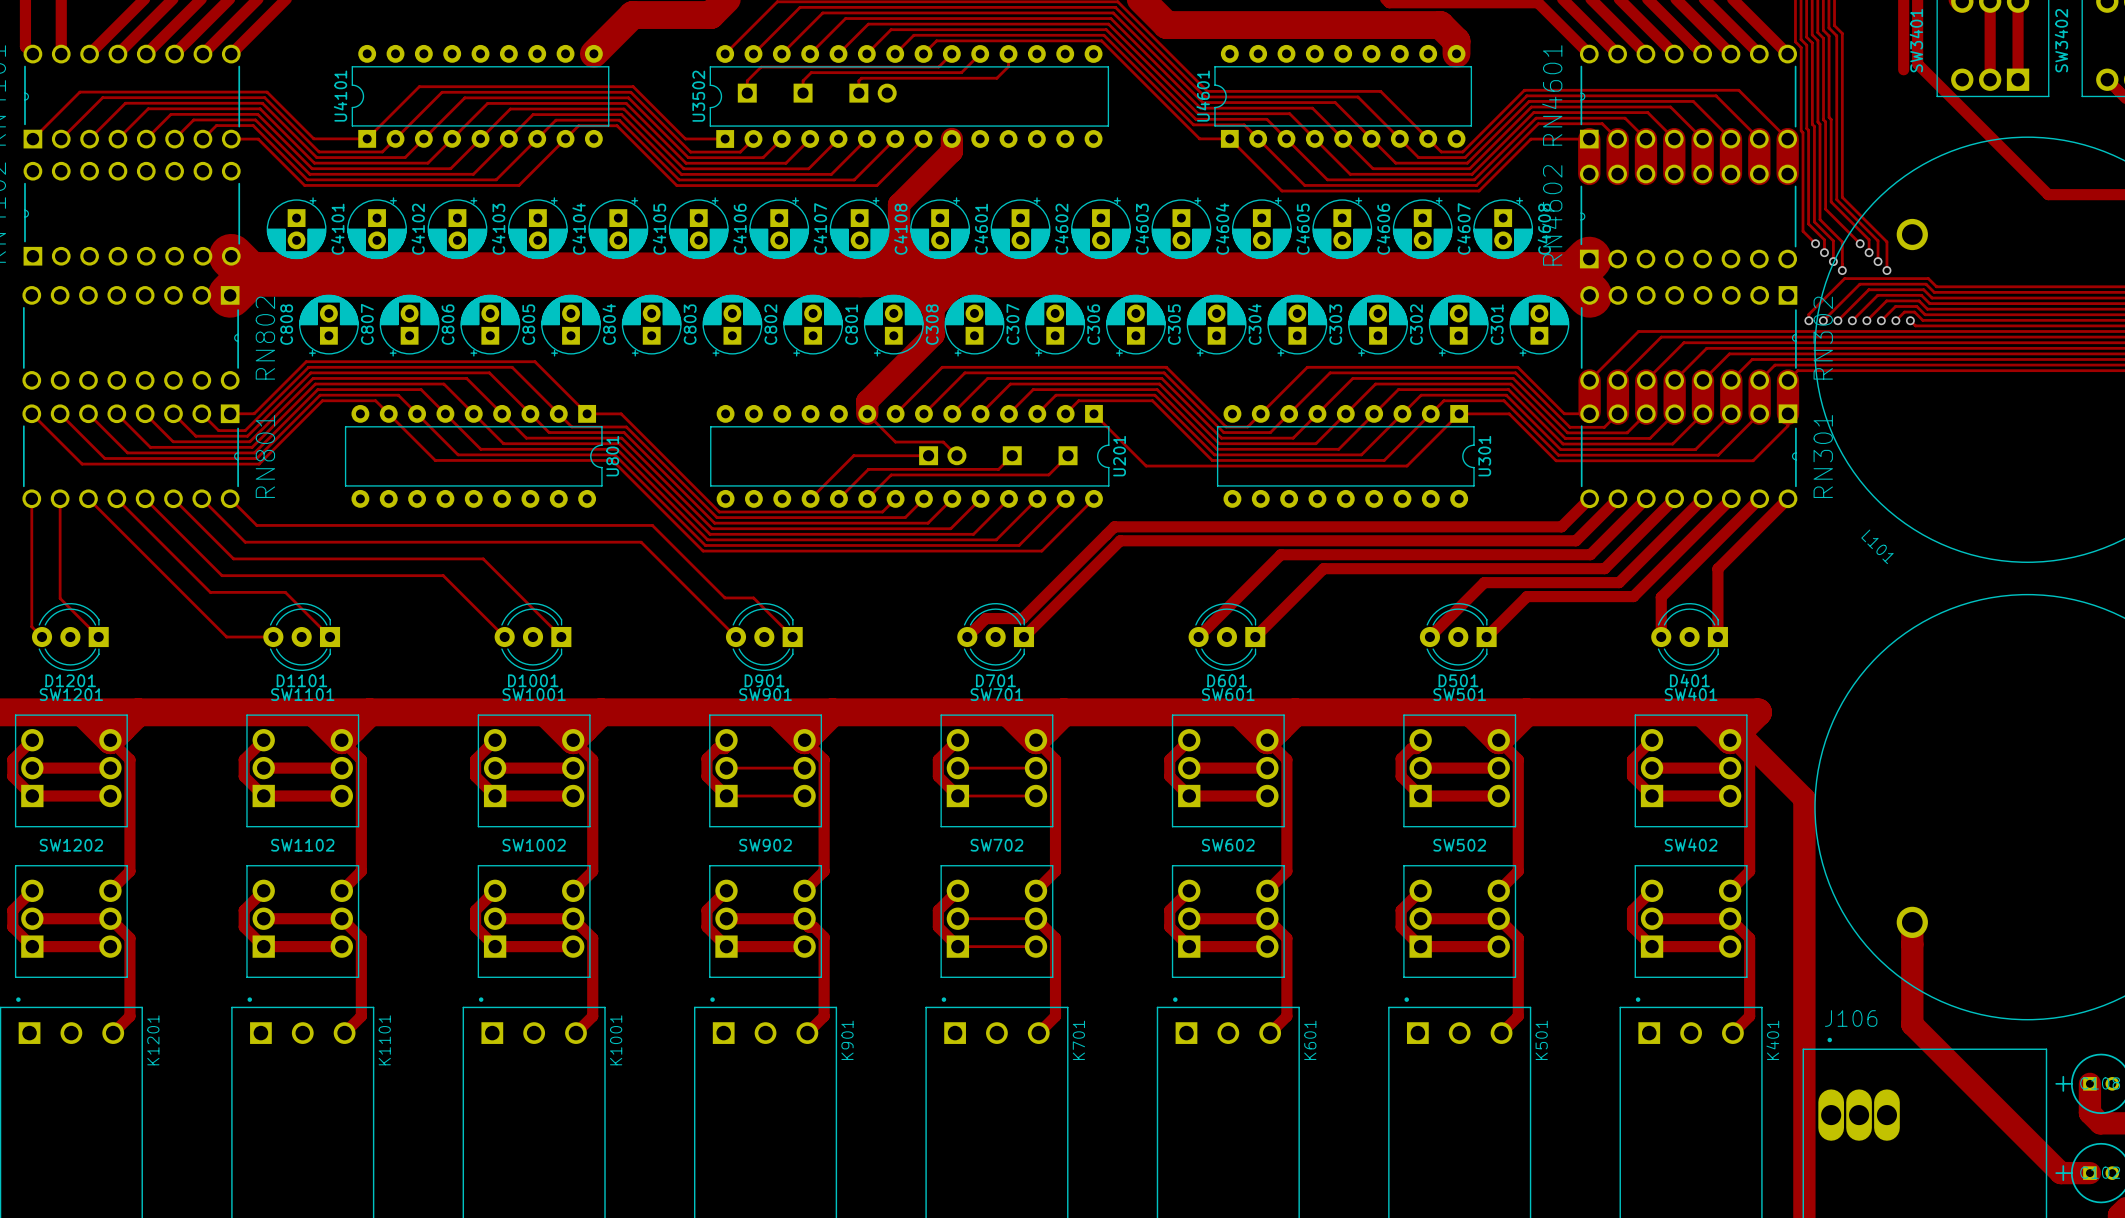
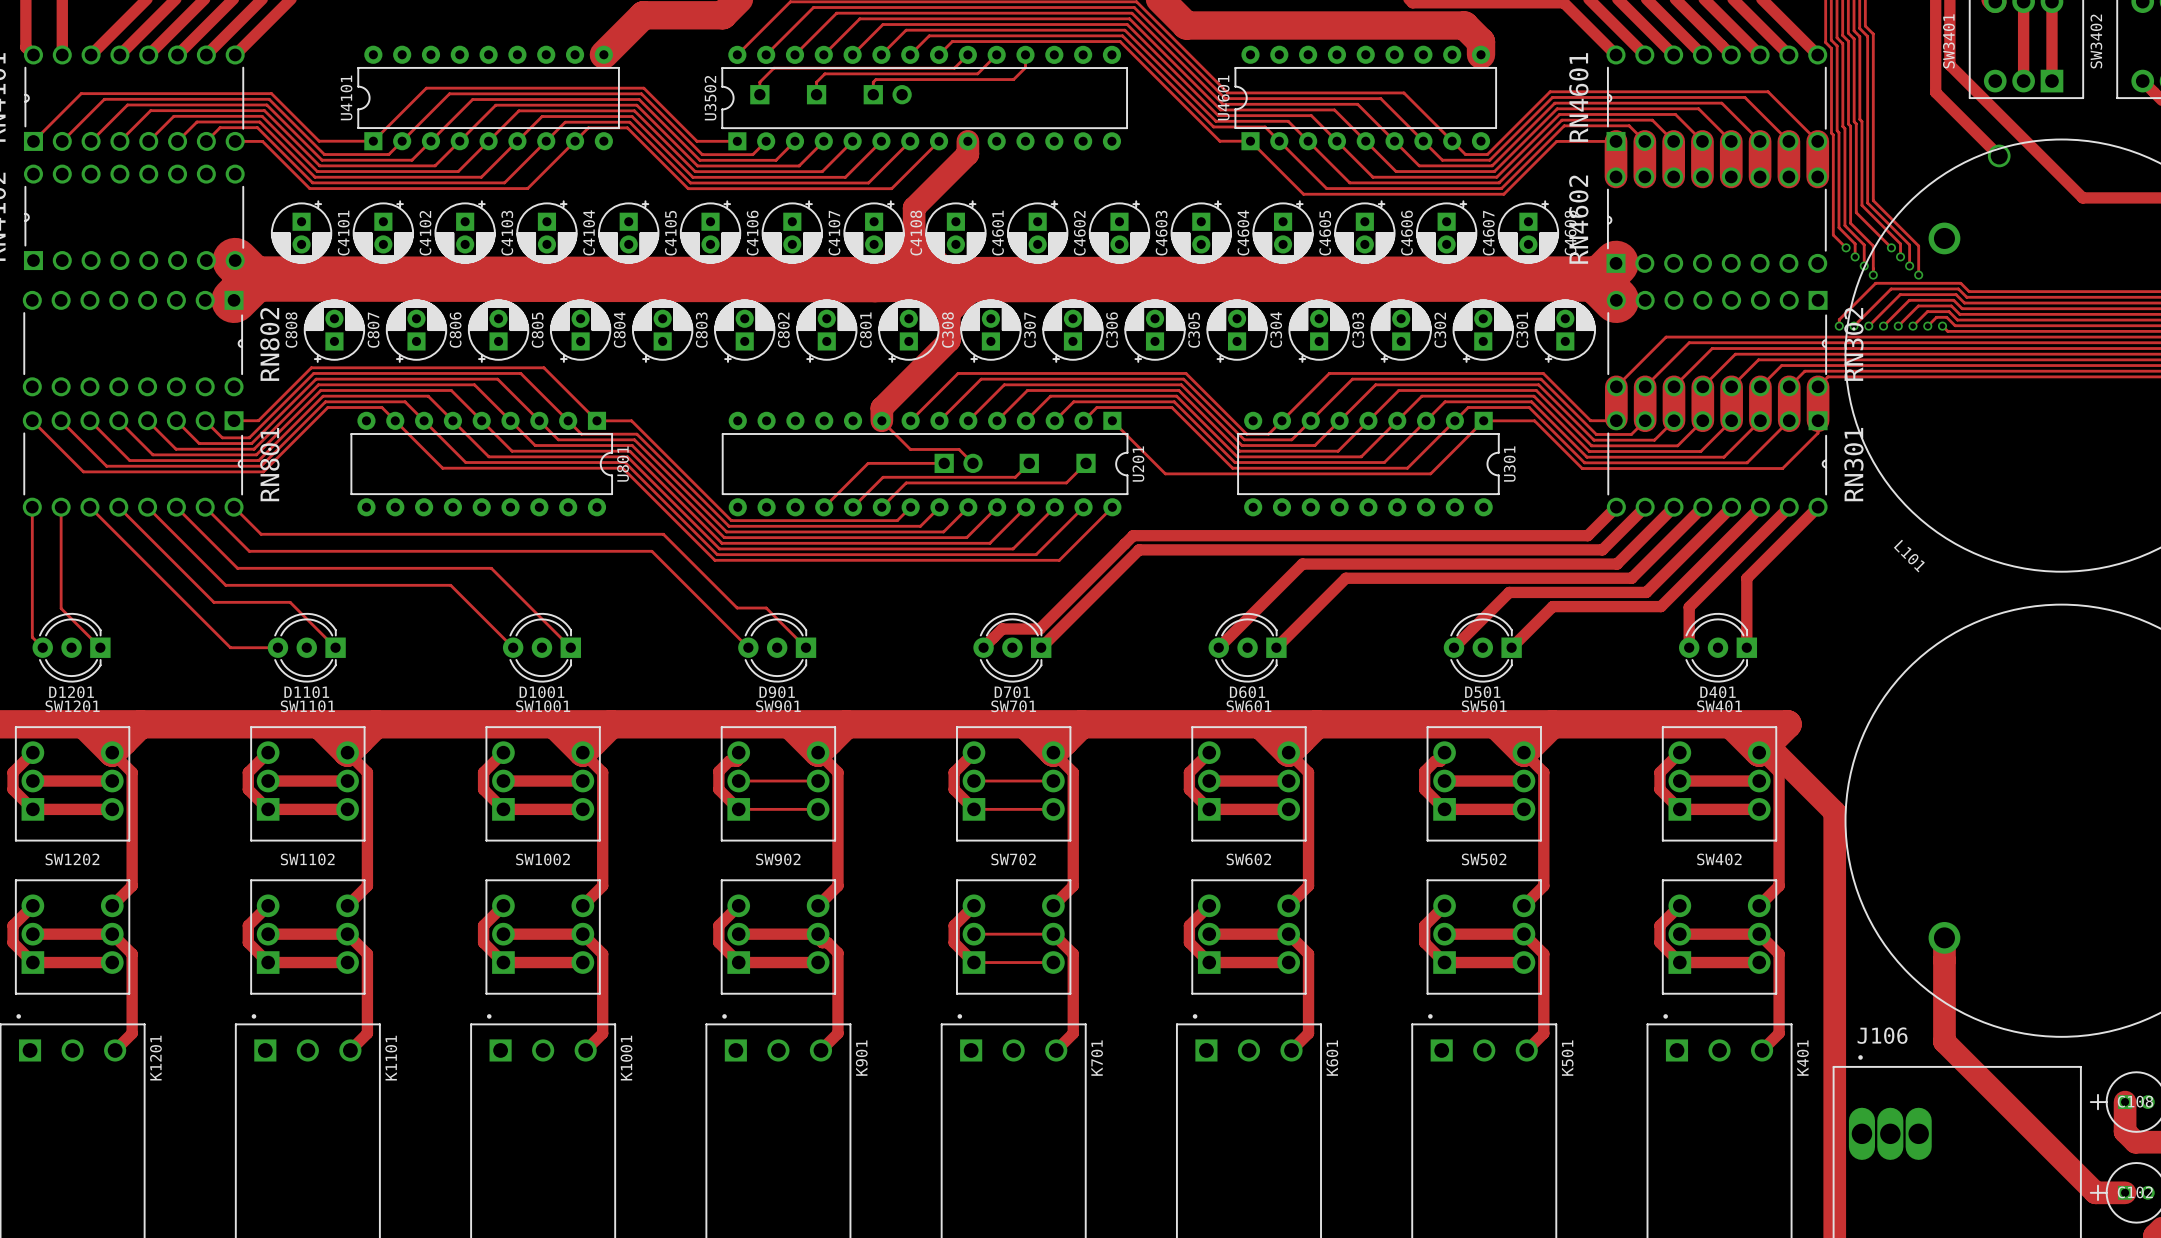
track: none -> (1935, 70) (1935, 92) (1999, 155)
via: none -> (1999, 155)

